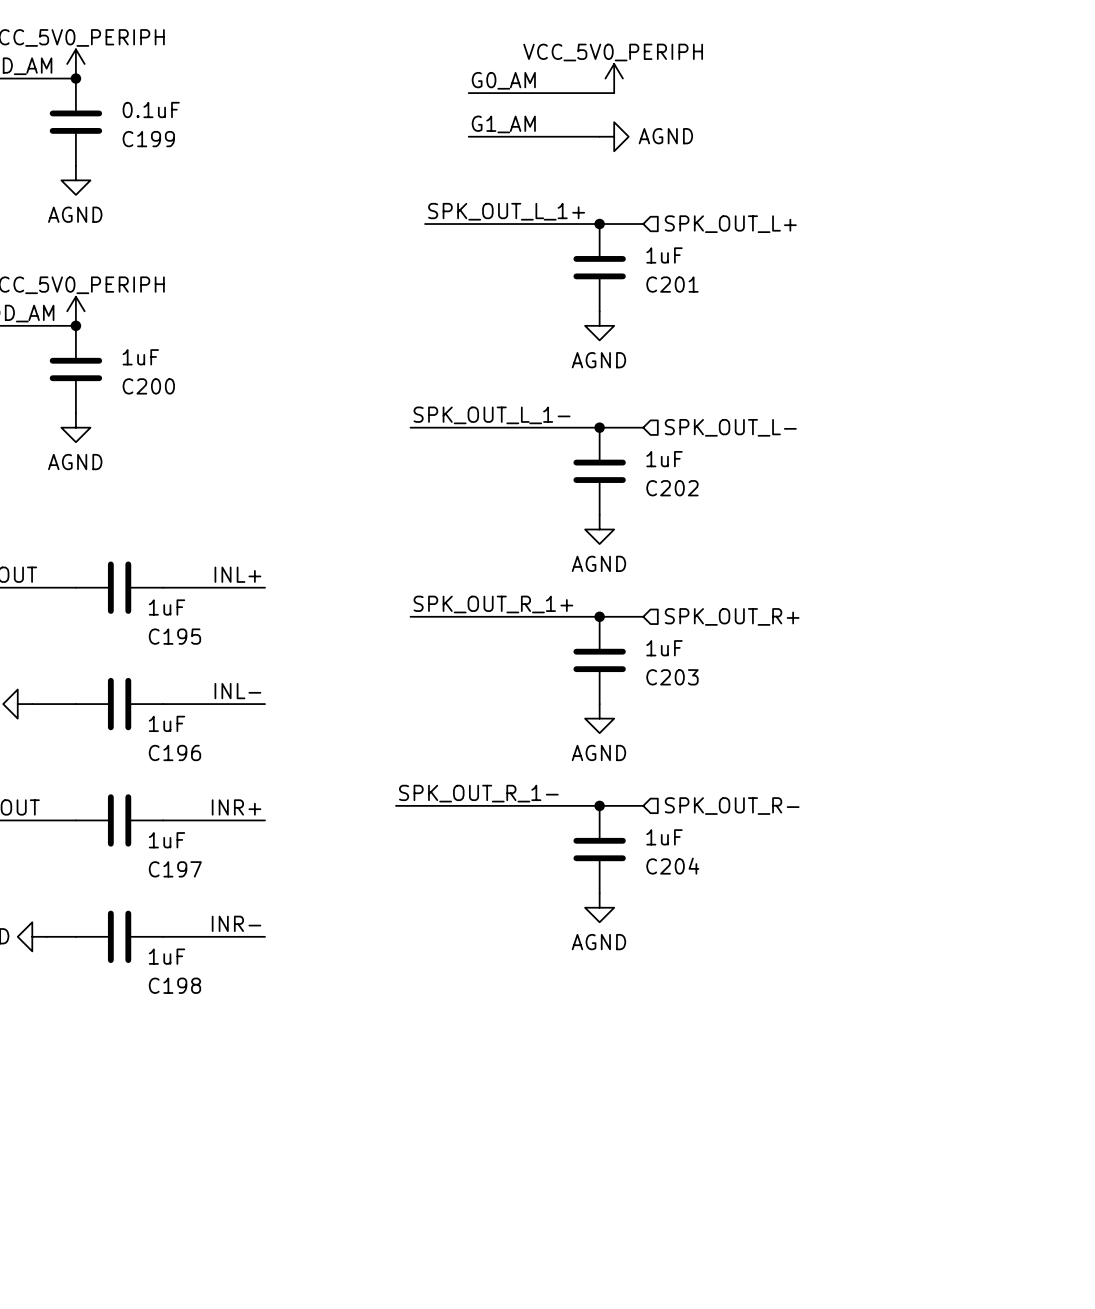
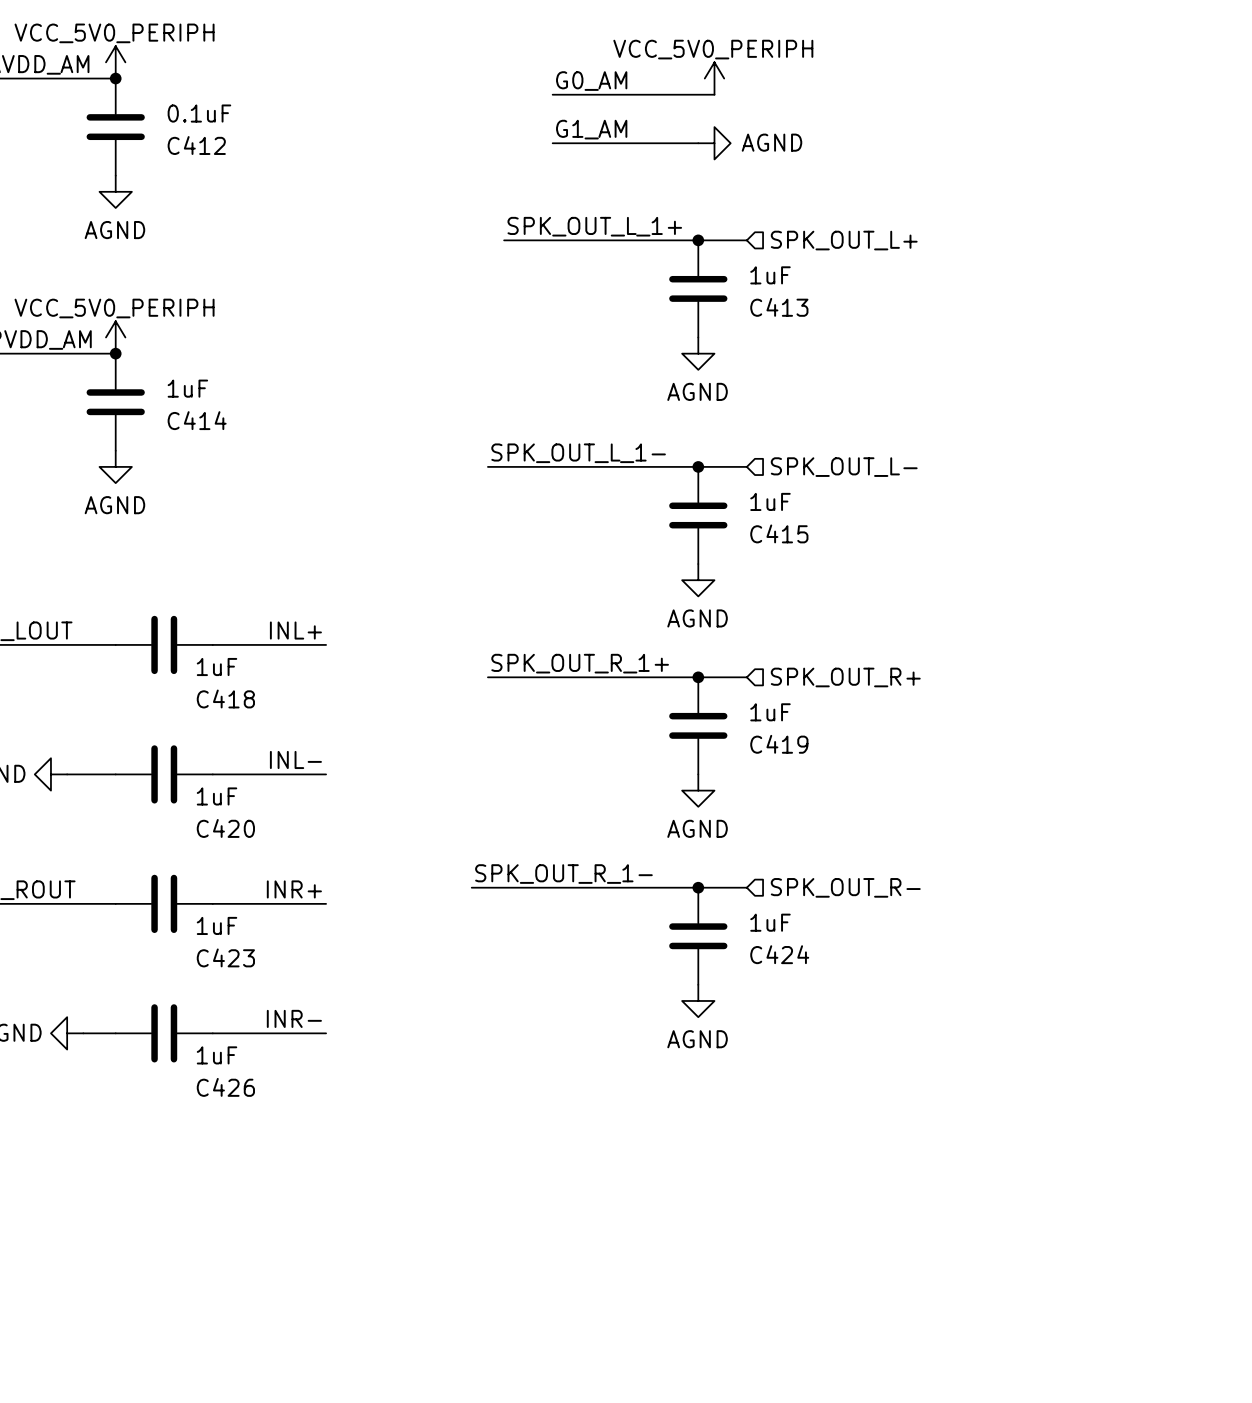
C199 name: C199 (148, 139) -> C412 (196, 145)
C201 name: C201 (672, 284) -> C413 (779, 307)
C200 name: C200 (148, 386) -> C414 (197, 420)
C202 name: C202 (672, 488) -> C415 (779, 533)
C195 name: C195 (174, 636) -> C418 (225, 698)
C203 name: C203 (672, 677) -> C419 (779, 744)
C196 name: C196 (174, 752) -> C420 (225, 828)
C204 name: C204 (672, 866) -> C424 (779, 954)
C197 name: C197 (175, 869) -> C423 (225, 957)
C198 name: C198 (174, 985) -> C426 (225, 1087)

